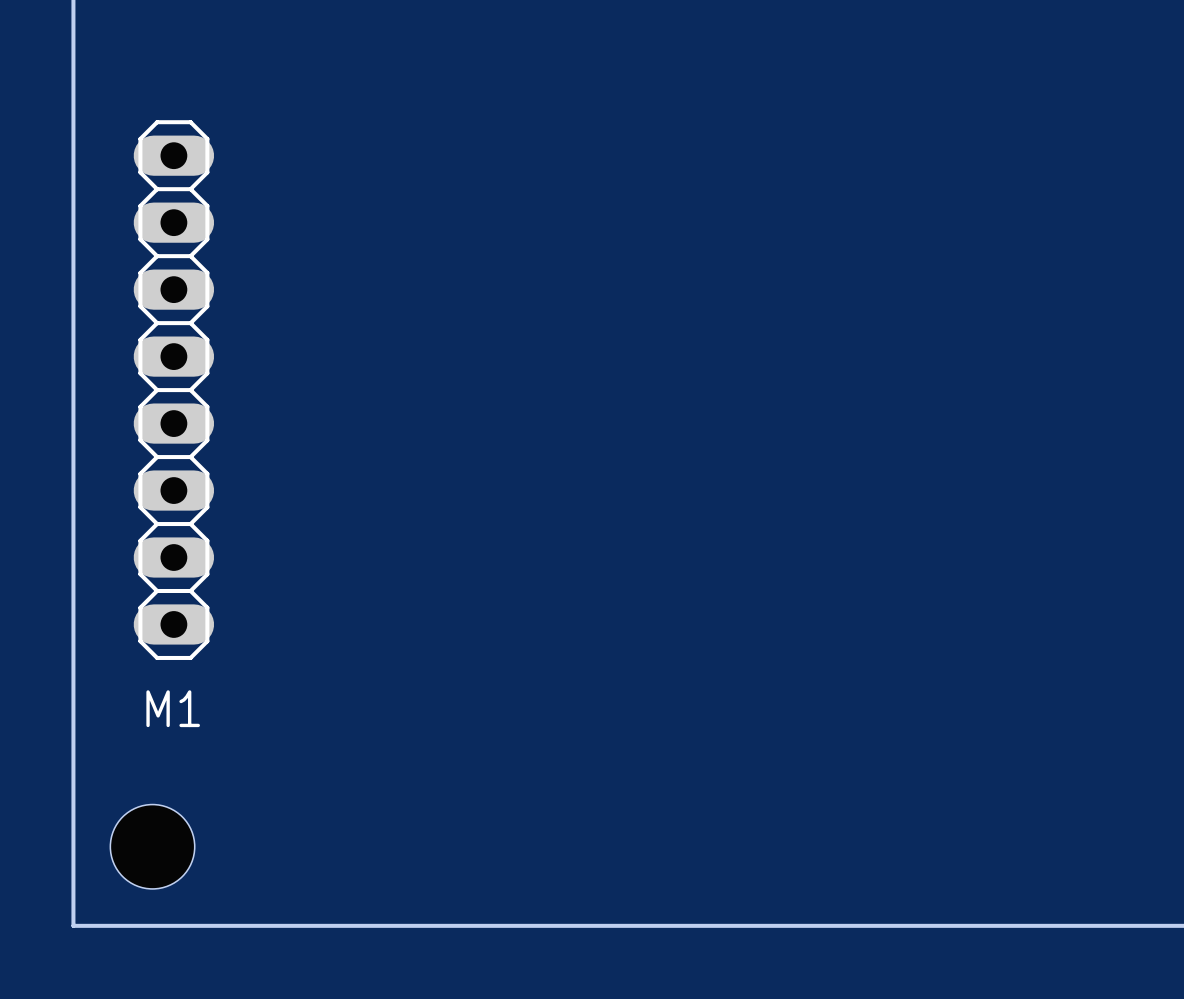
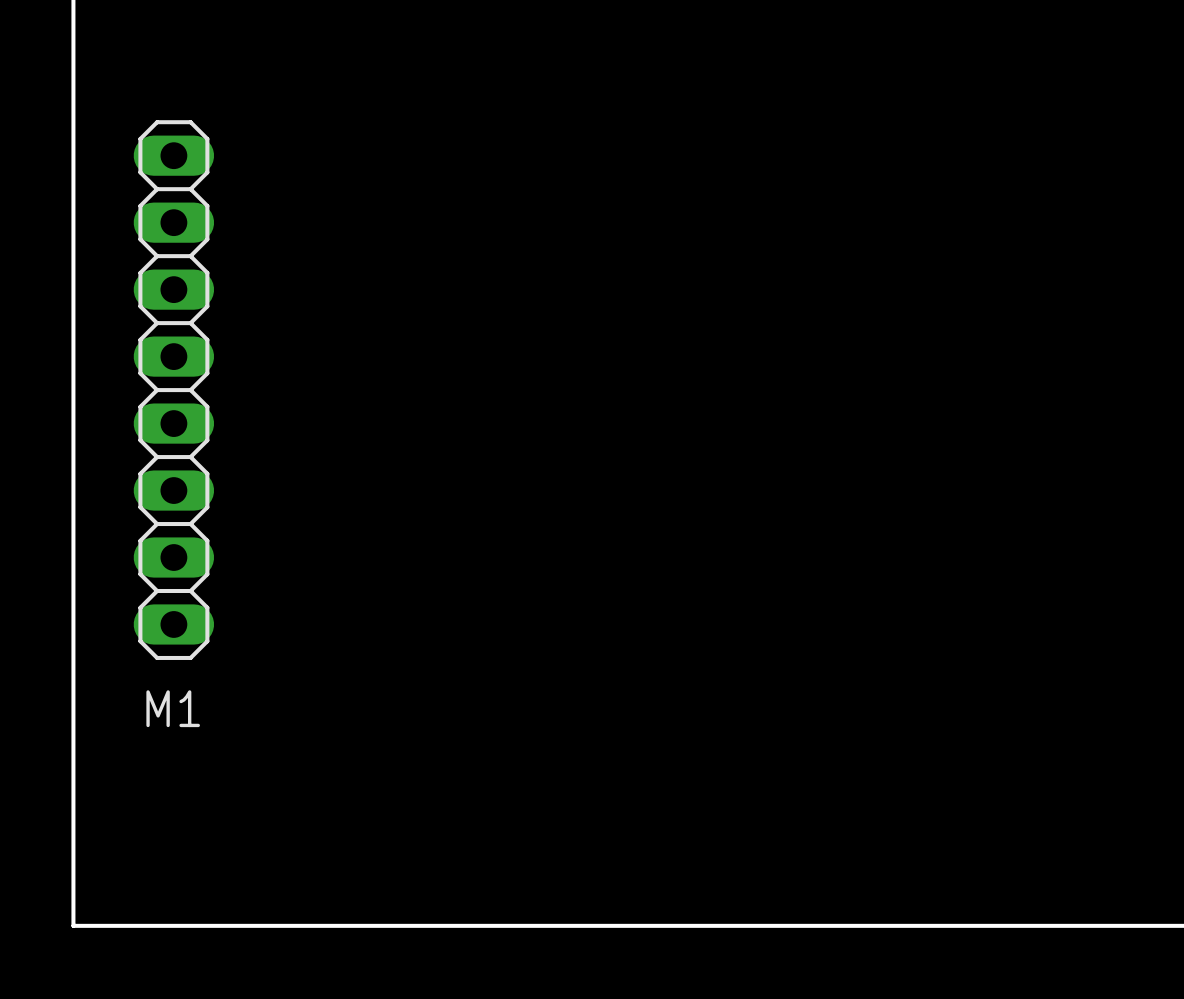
hole: (152, 846) -> none

